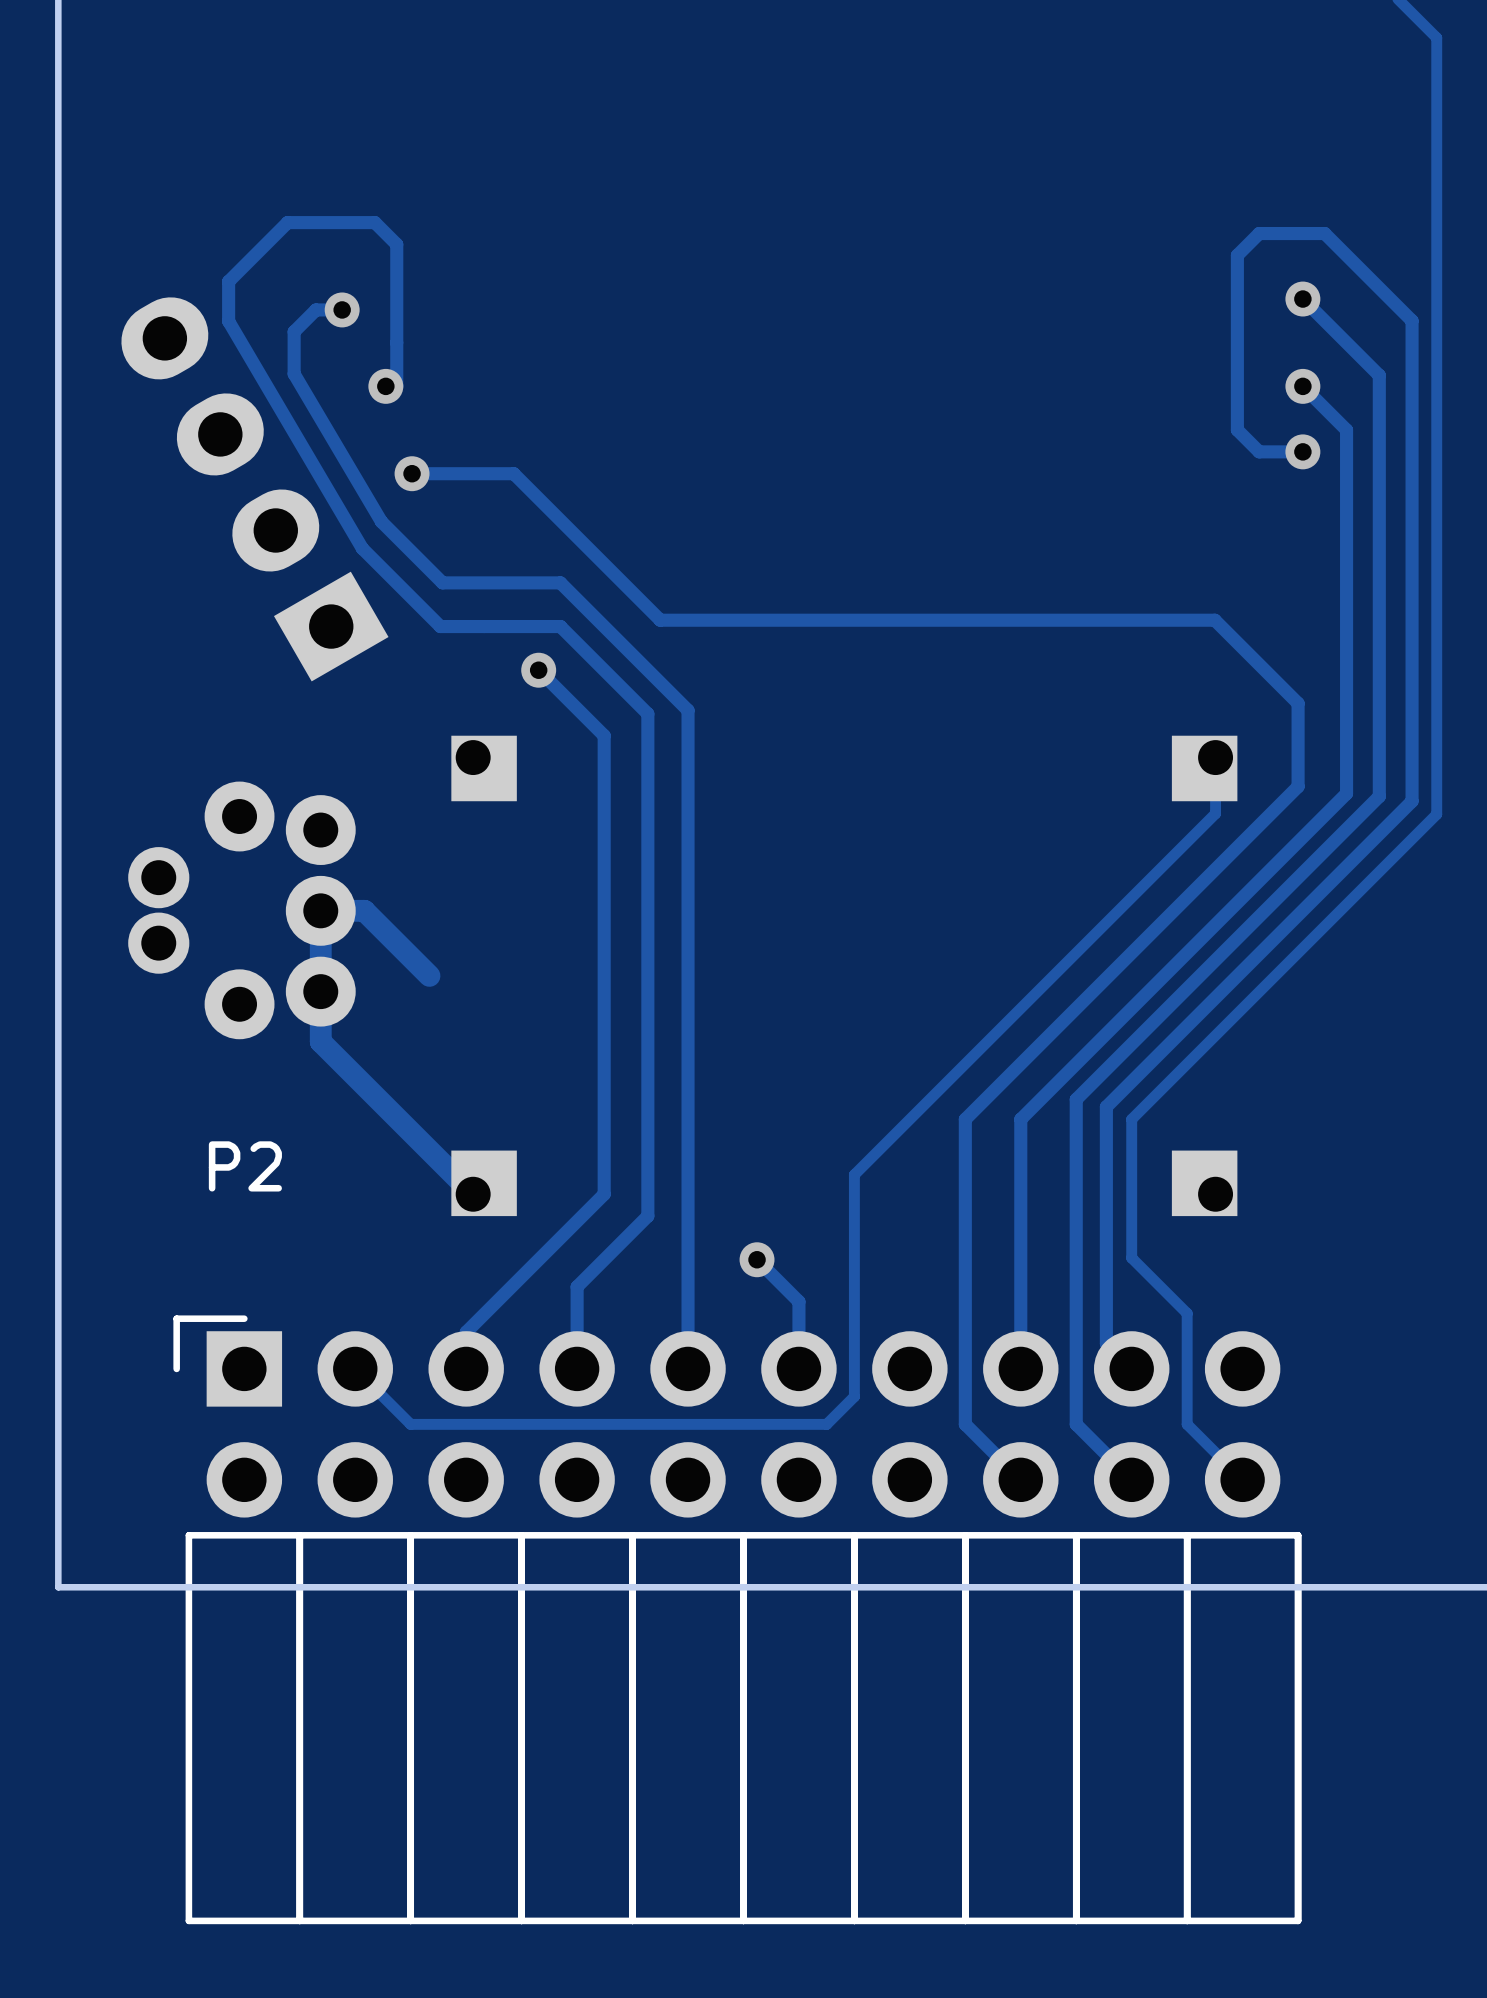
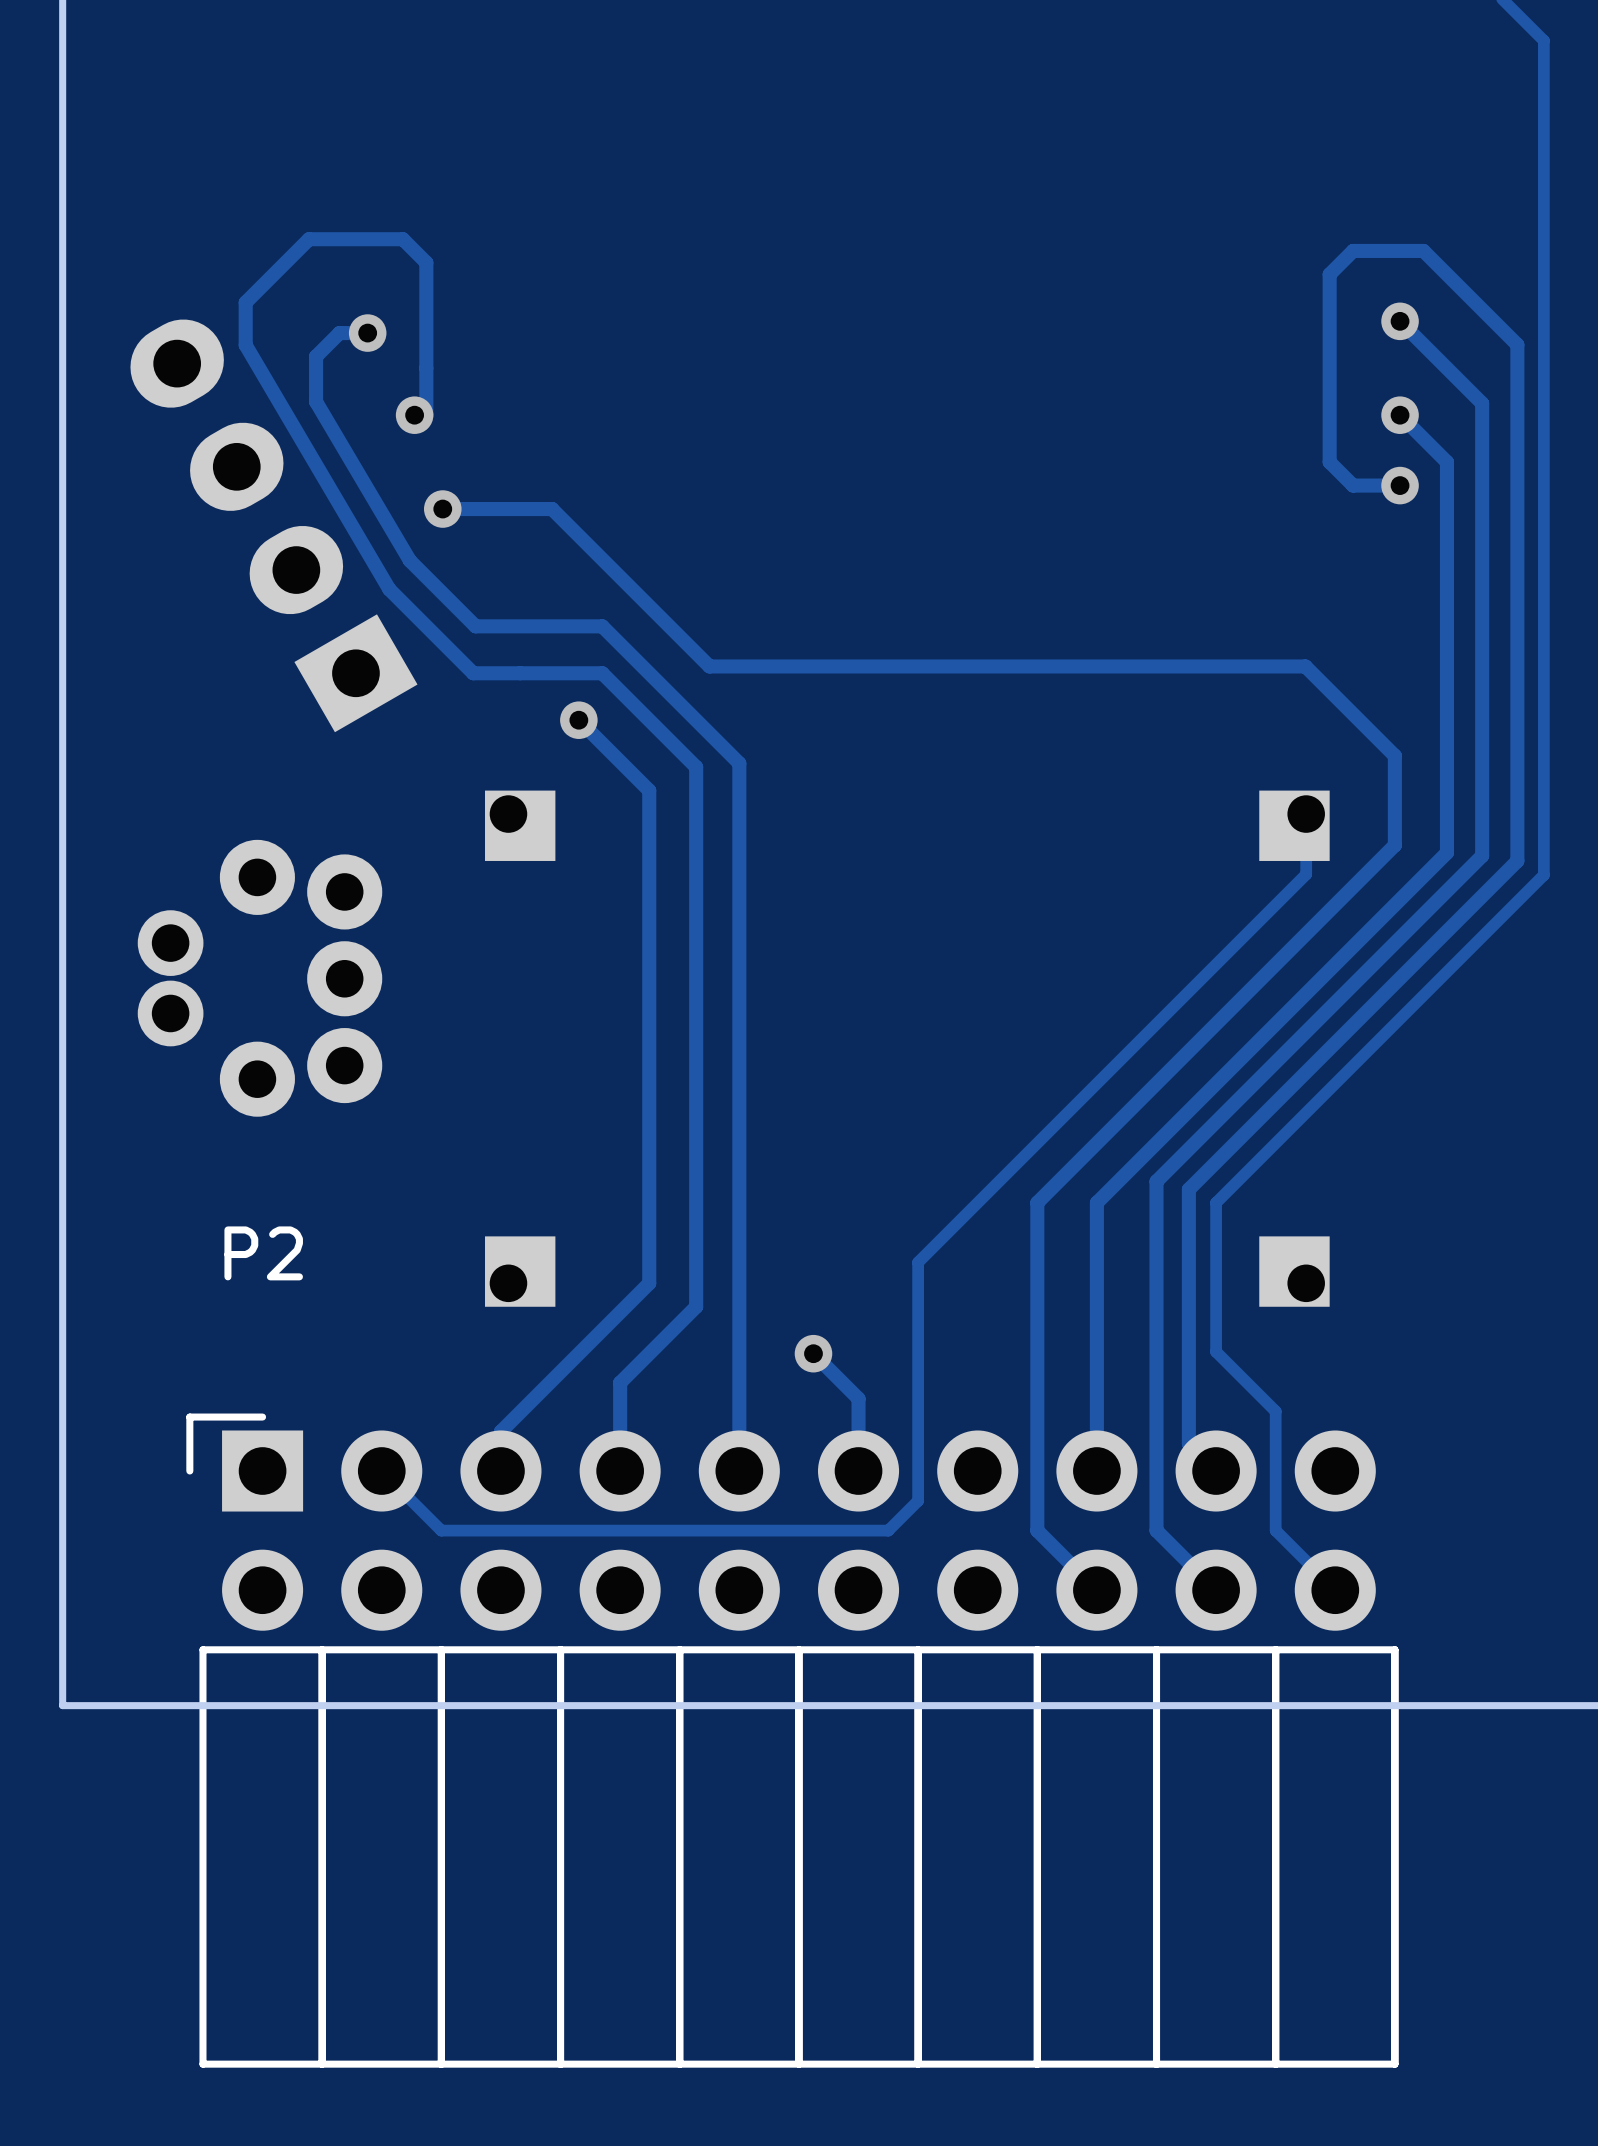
track: (429, 975) (364, 910) (320, 910) (320, 1041) (473, 1194) -> none

